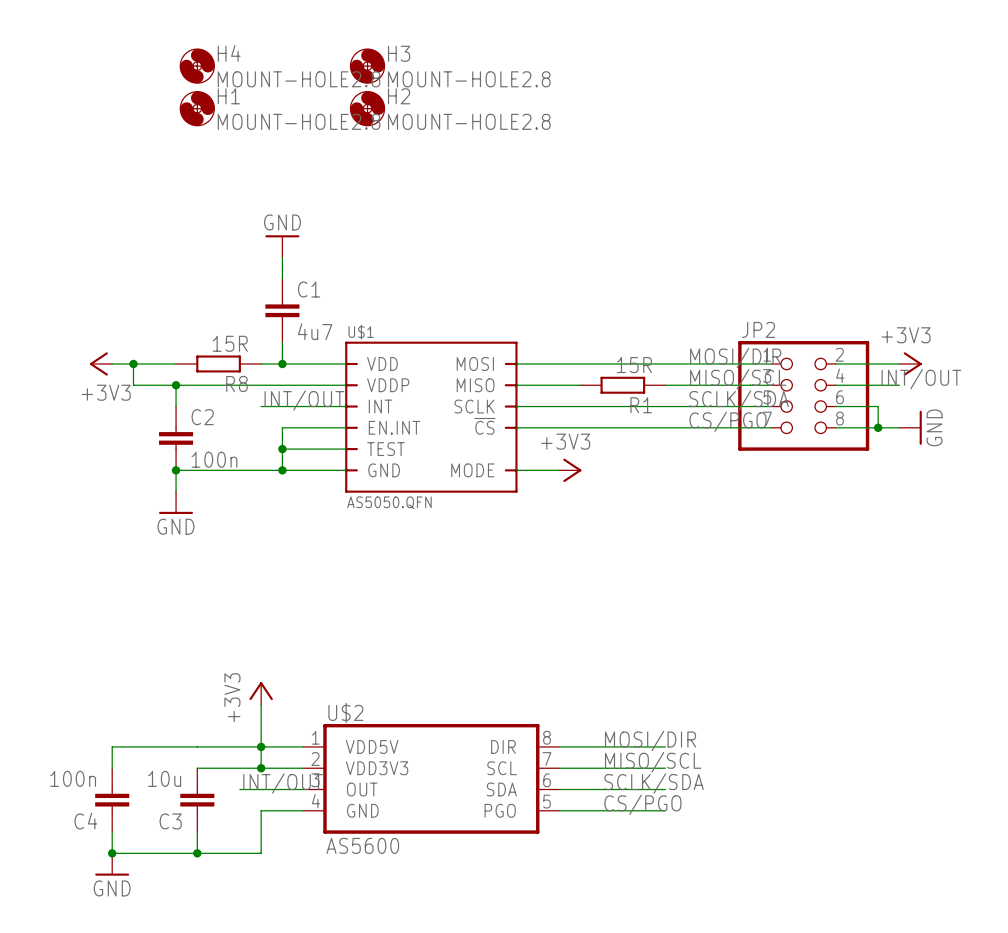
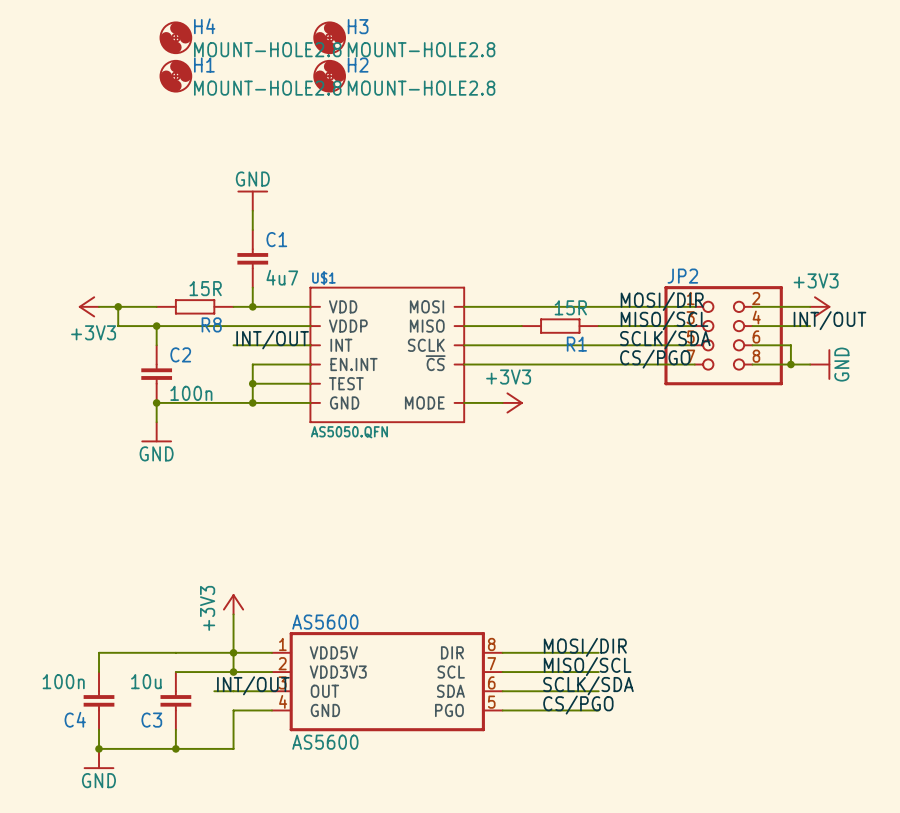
U$2 name: U$2 (345, 712) -> AS5600 (325, 622)

